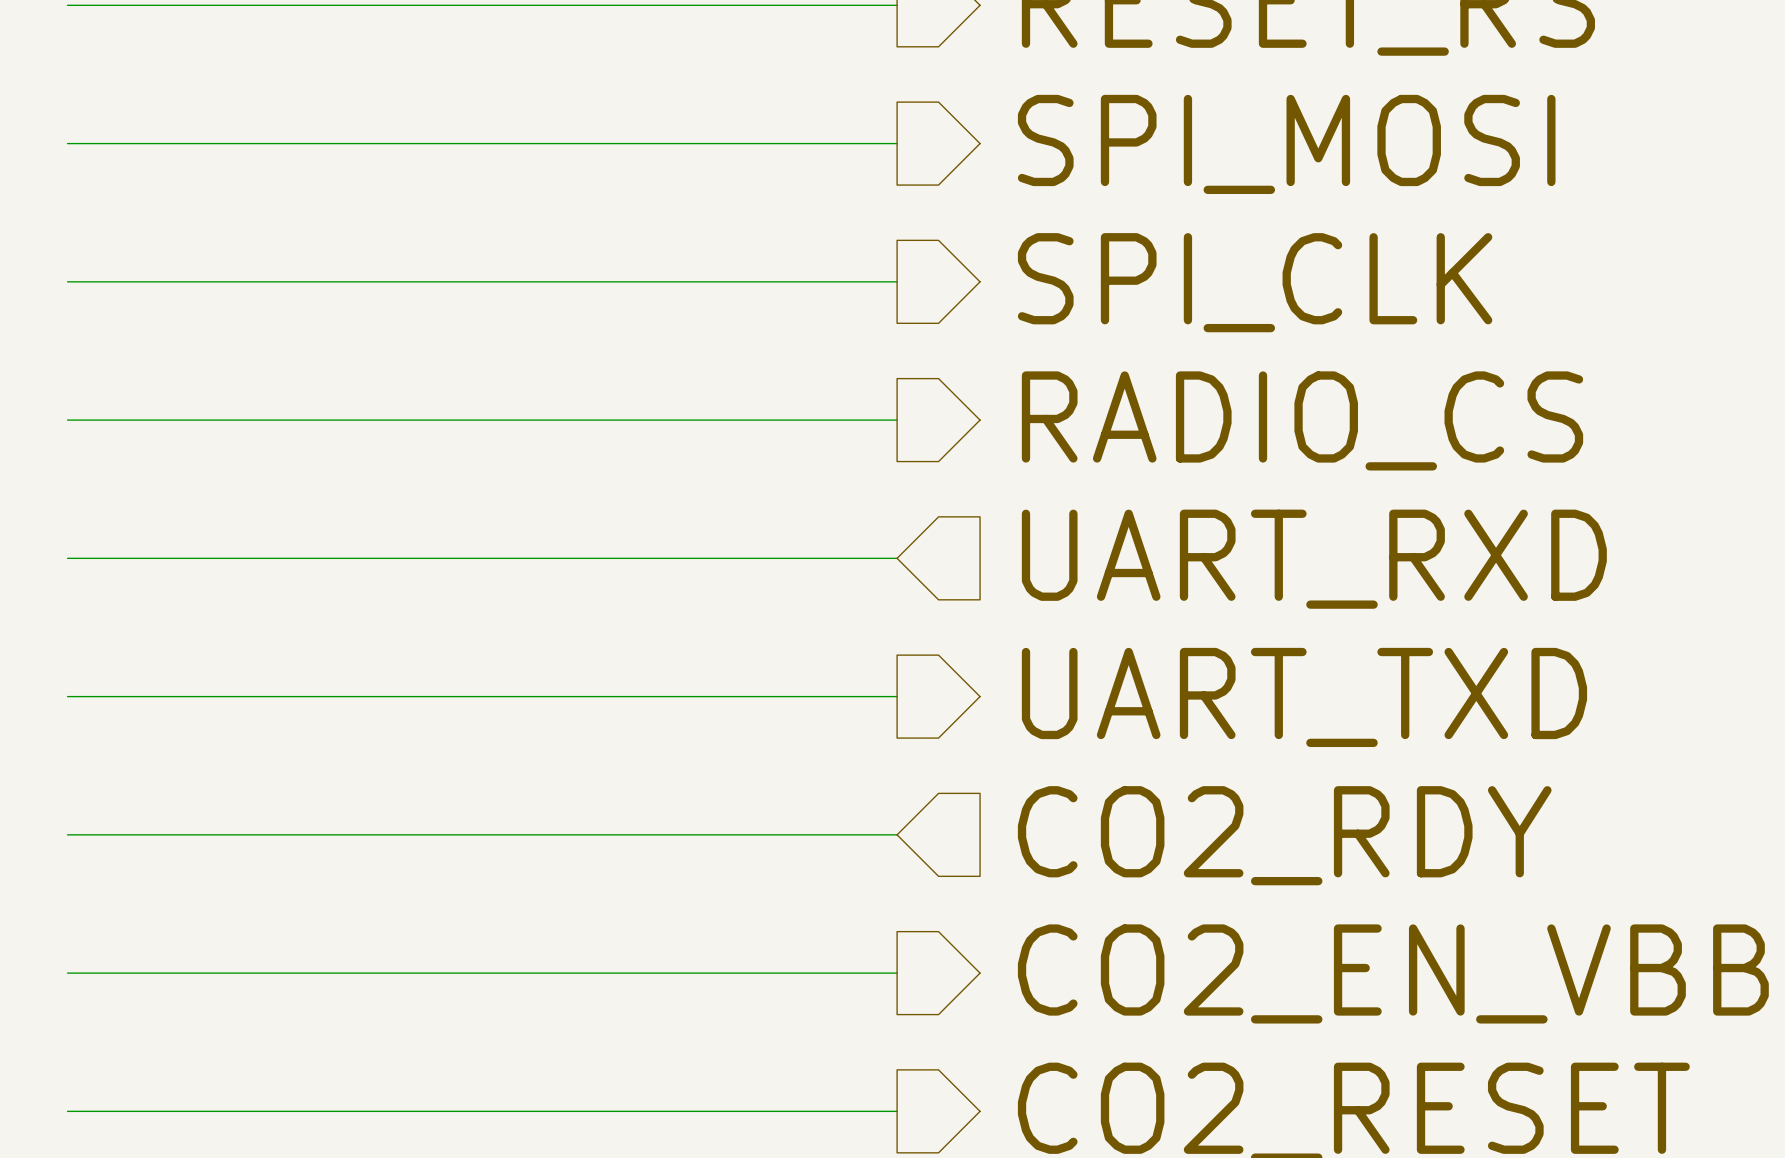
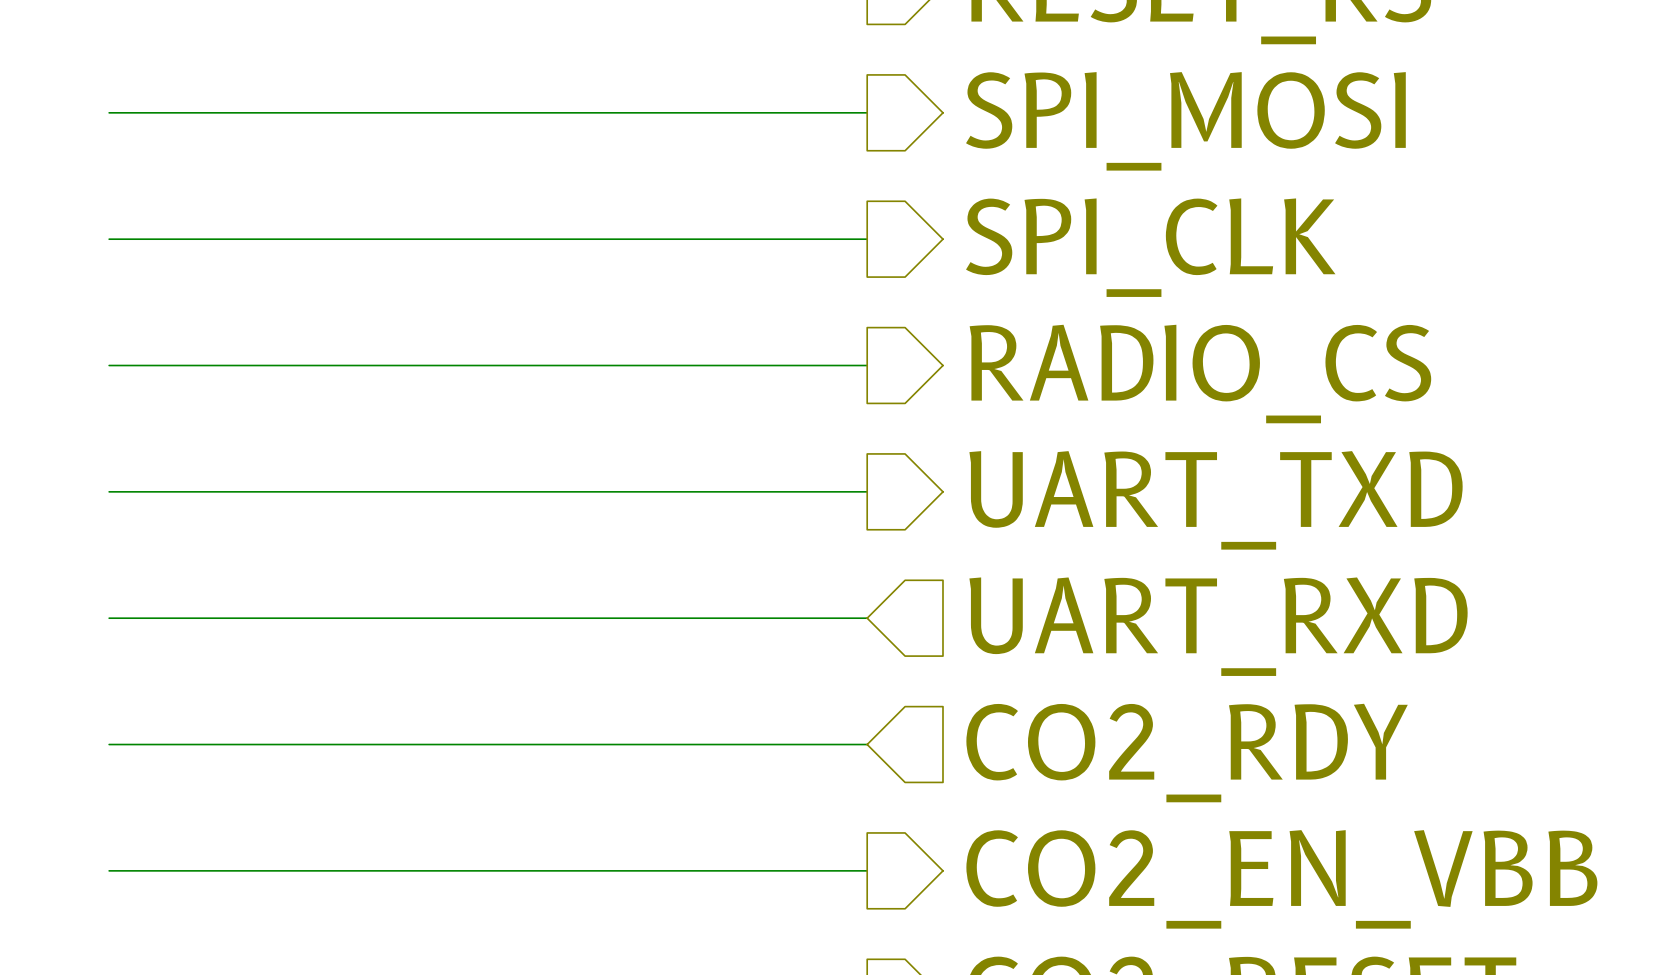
hierarchical label shape: input (1314, 559) -> output (1216, 500)
hierarchical label: UART_RXD (1314, 559) -> UART_TXD (1216, 500)
hierarchical label shape: output (1304, 697) -> input (1218, 626)
hierarchical label: UART_TXD (1304, 697) -> UART_RXD (1218, 626)

